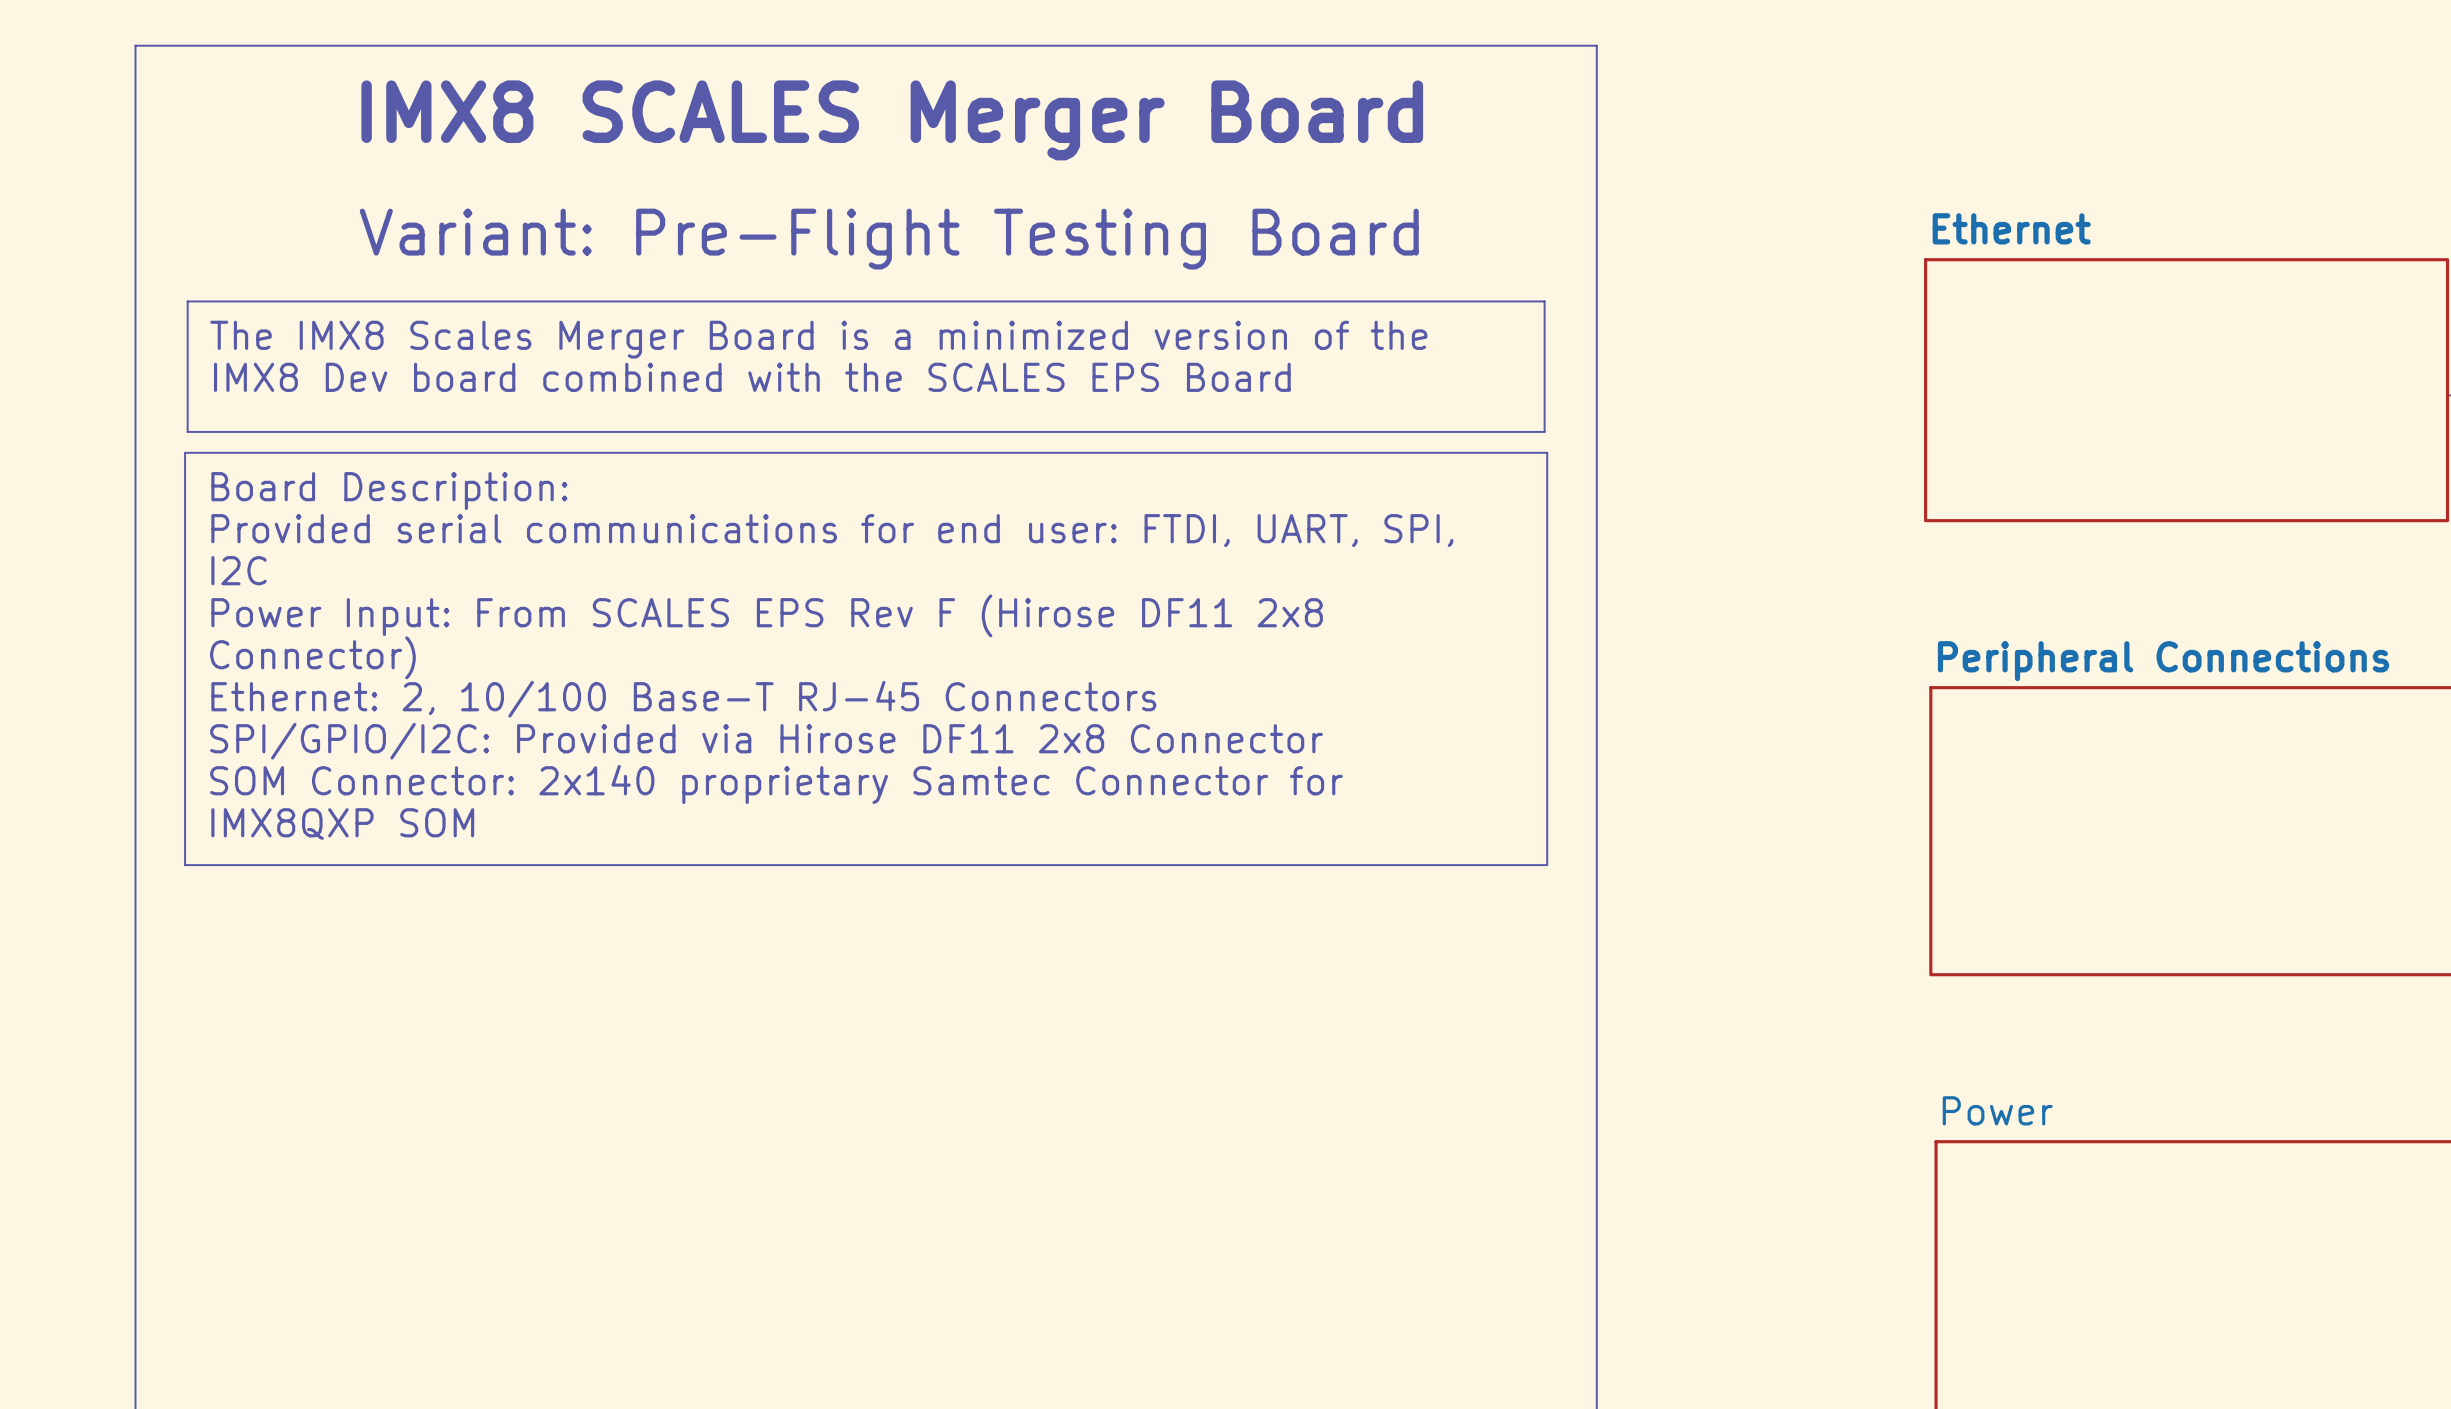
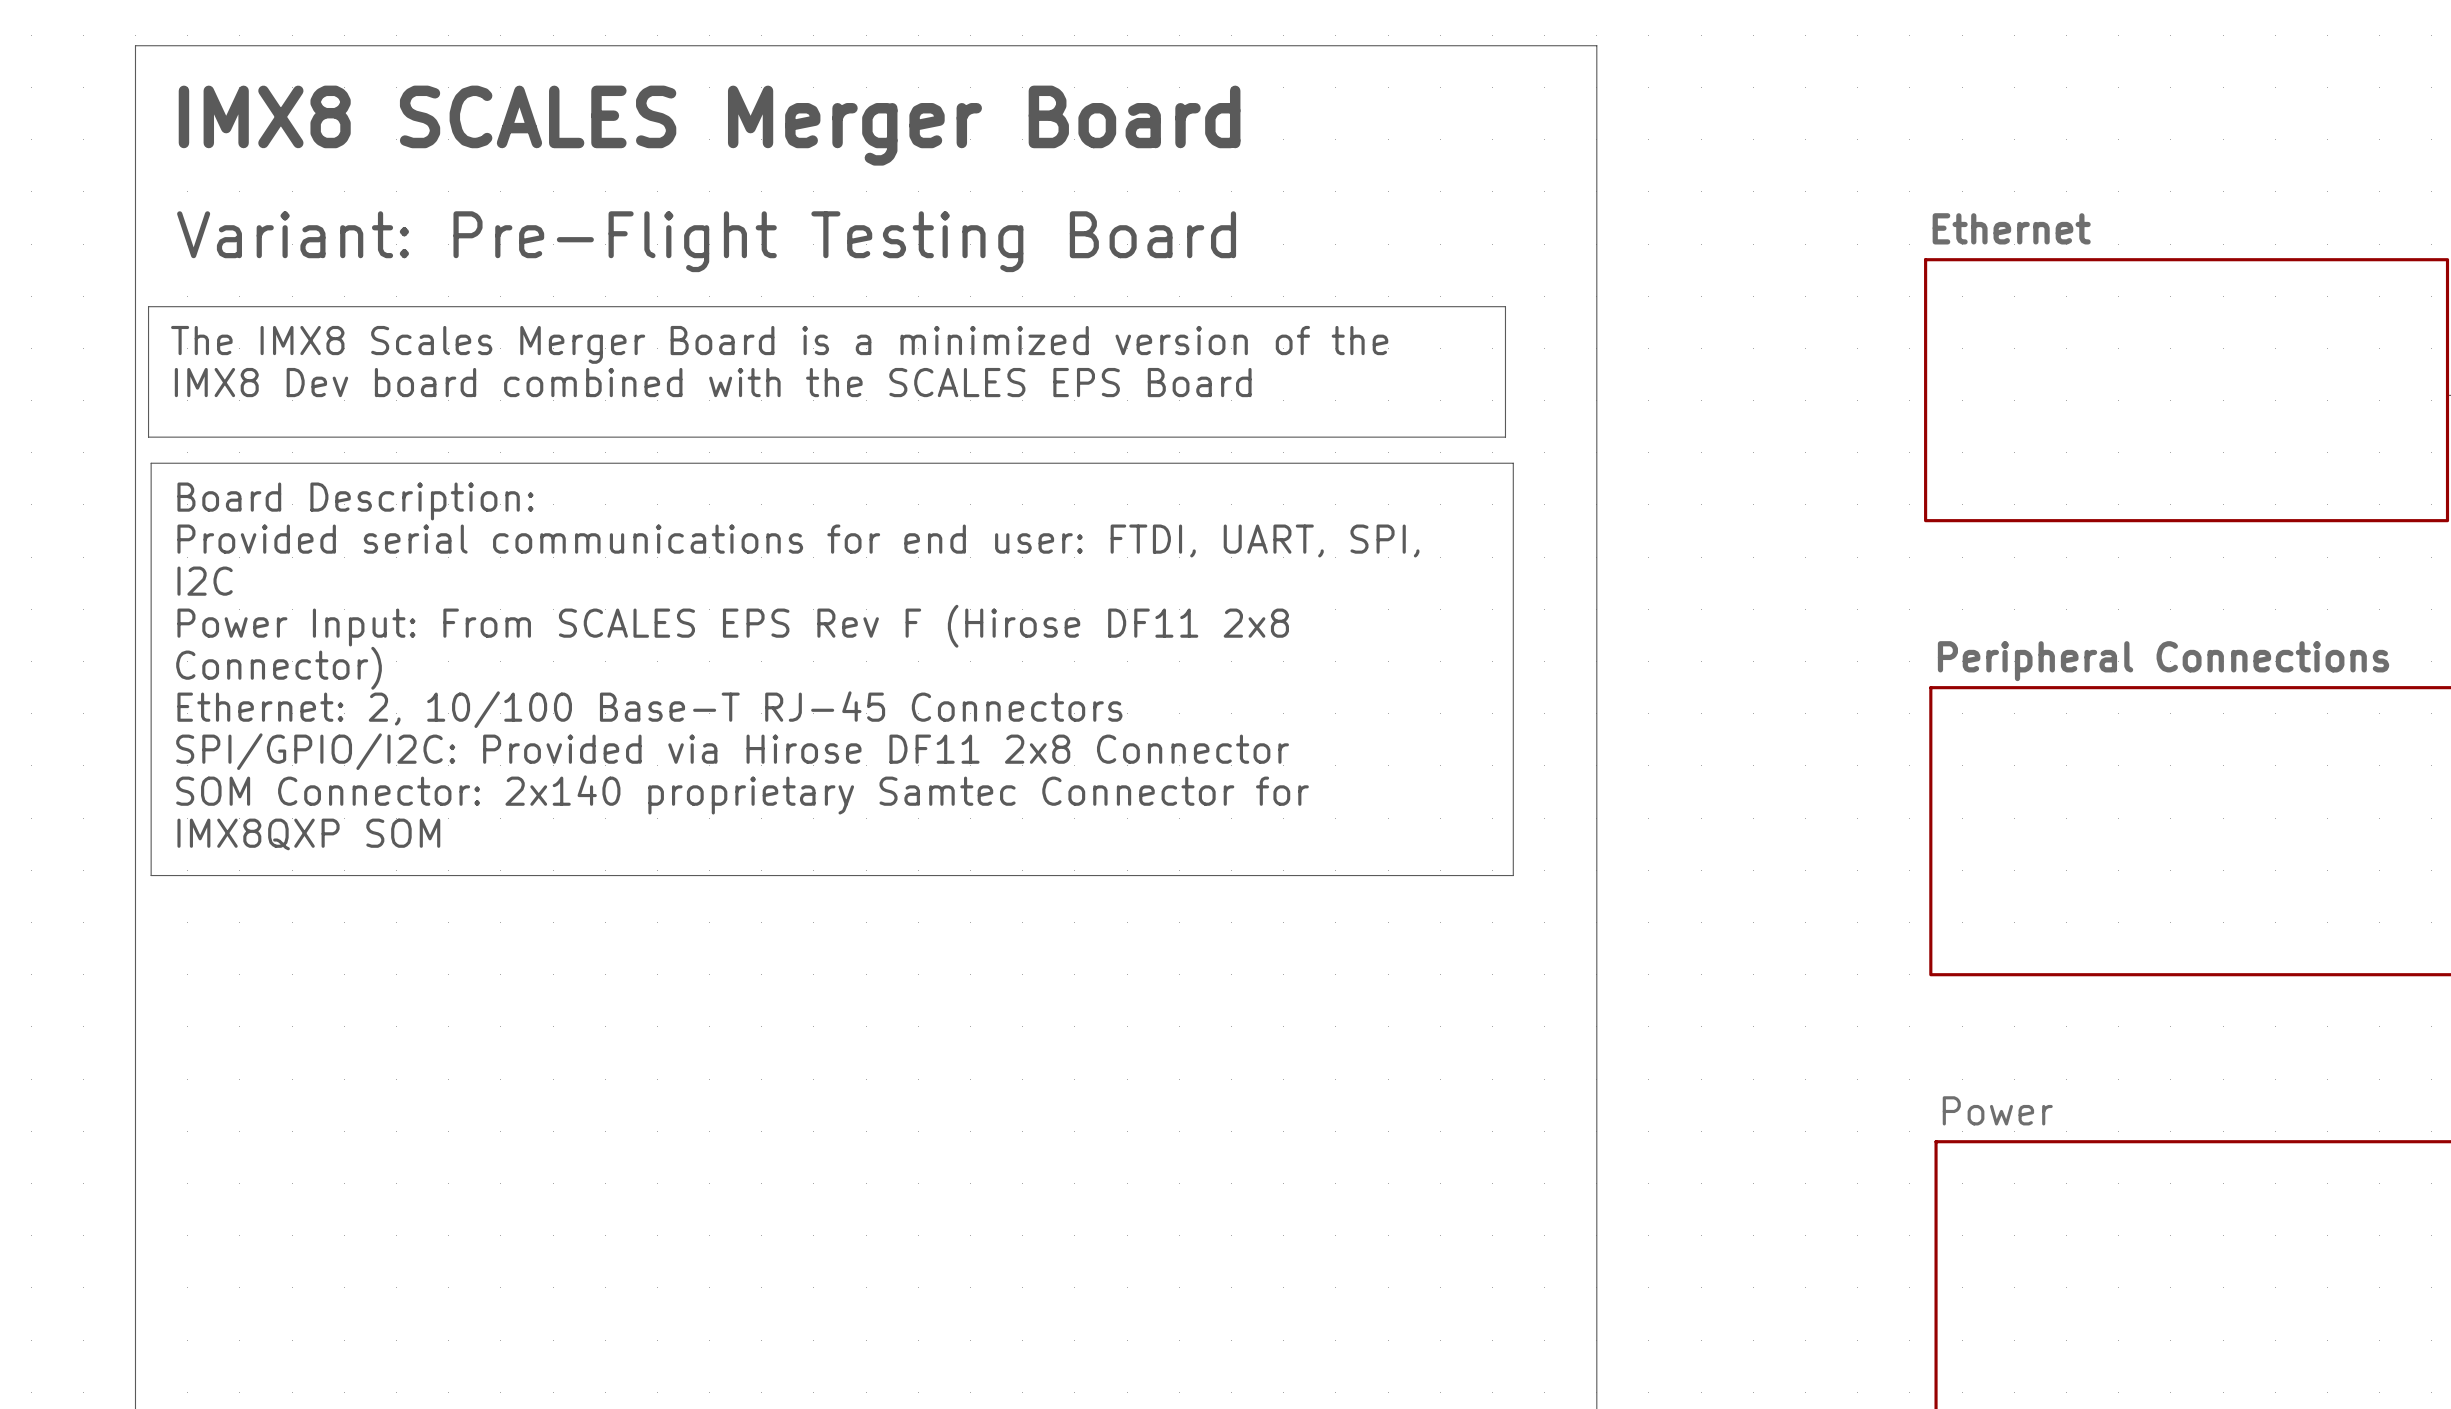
text position: IMX8 SCALES Merger Board (892, 120) -> IMX8 SCALES Merger Board (709, 125)
text position: Variant: Pre-Flight Testing Board (889, 239) -> Variant: Pre-Flight Testing Board (706, 241)
line: (187, 301) (1544, 301) (1544, 431) (187, 431) (187, 301) -> (148, 306) (1505, 306) (1505, 437) (148, 437) (148, 306)
text position: The IMX8 Scales Merger Board is a minimized version of the (818, 339) -> The IMX8 Scales Merger Board is a minimized version of the (779, 344)
text position: IMX8 Dev board combined with the SCALES EPS Board (752, 377) -> IMX8 Dev board combined with the SCALES EPS Board (713, 382)
line: (185, 452) (1547, 452) (1547, 865) (185, 865) (185, 452) -> (151, 463) (1513, 463) (1513, 875) (151, 875) (151, 463)
text position: Board Description: (389, 491) -> Board Description: (355, 501)
text position: Provided serial communications for end user: FTDI, UART, SPI, (832, 530) -> Provided serial communications for end user: FTDI, UART, SPI, (798, 540)
text position: I2C (239, 570) -> I2C (205, 581)
text position: Power Input: From SCALES EPS Rev F (Hirose DF11 2x8 (767, 615) -> Power Input: From SCALES EPS Rev F (Hirose DF11 2x8 (733, 626)
text position: Connector) (312, 657) -> Connector) (279, 668)
text position: Ethernet: 2, 10/100 Base-T RJ-45 Connectors (683, 699) -> Ethernet: 2, 10/100 Base-T RJ-45 Connectors (649, 709)
text position: SPI/GPIO/I2C: Provided via Hirose DF11 2x8 Connector (766, 741) -> SPI/GPIO/I2C: Provided via Hirose DF11 2x8 Connector (732, 751)
text position: SOM Connector: 2x140 proprietary Samtec Connector for (776, 784) -> SOM Connector: 2x140 proprietary Samtec Connector for (742, 794)
text position: IMX8QXP SOM (342, 824) -> IMX8QXP SOM (308, 834)

